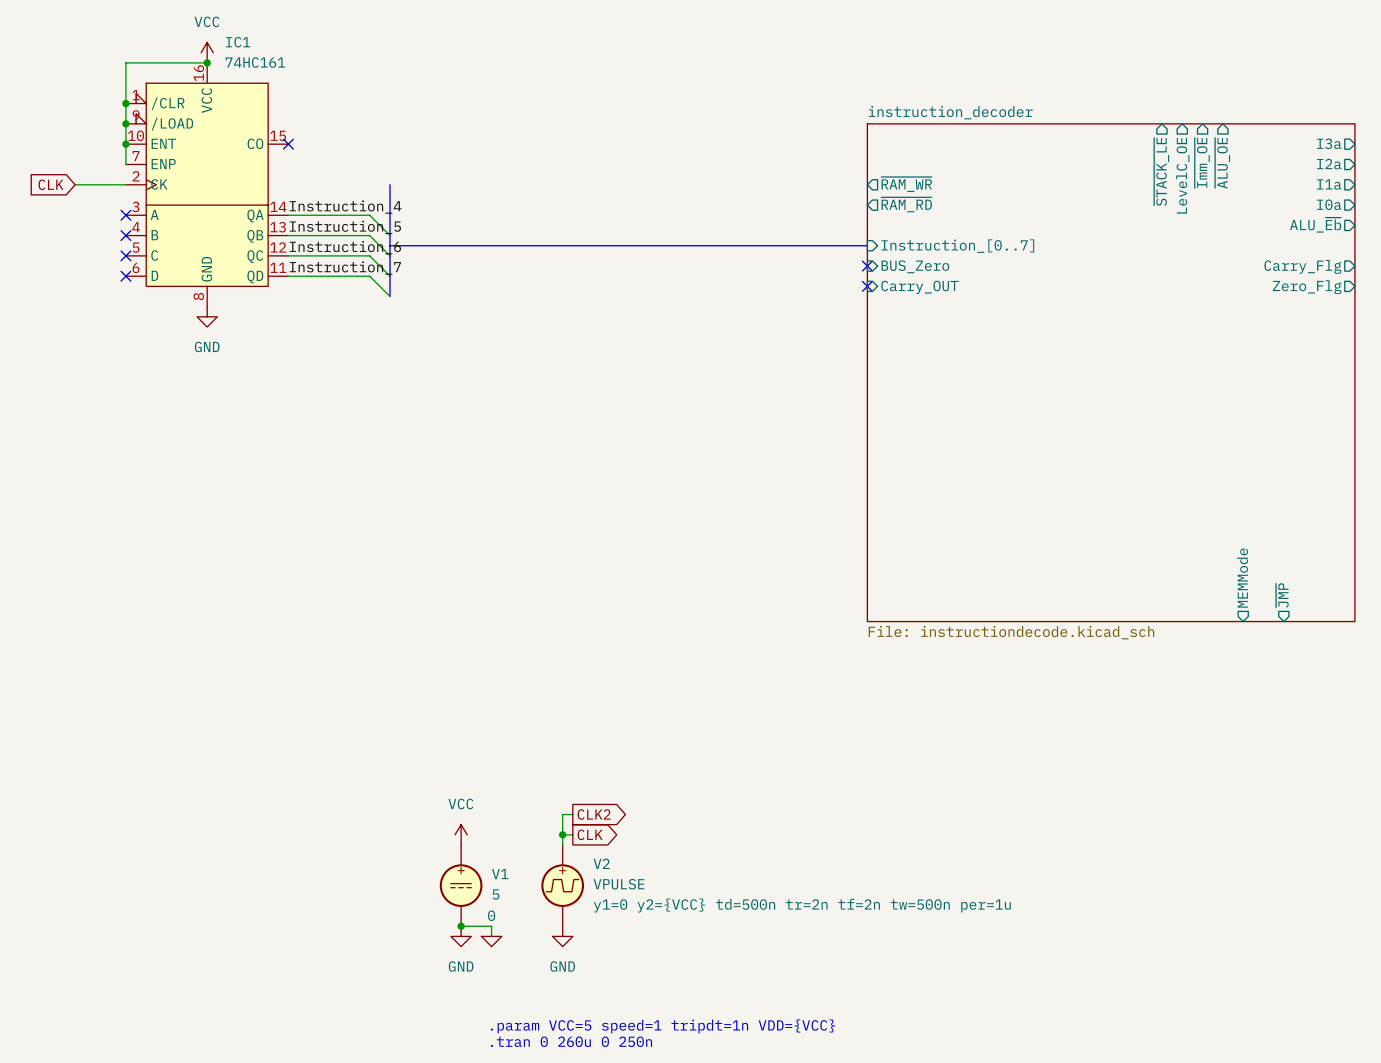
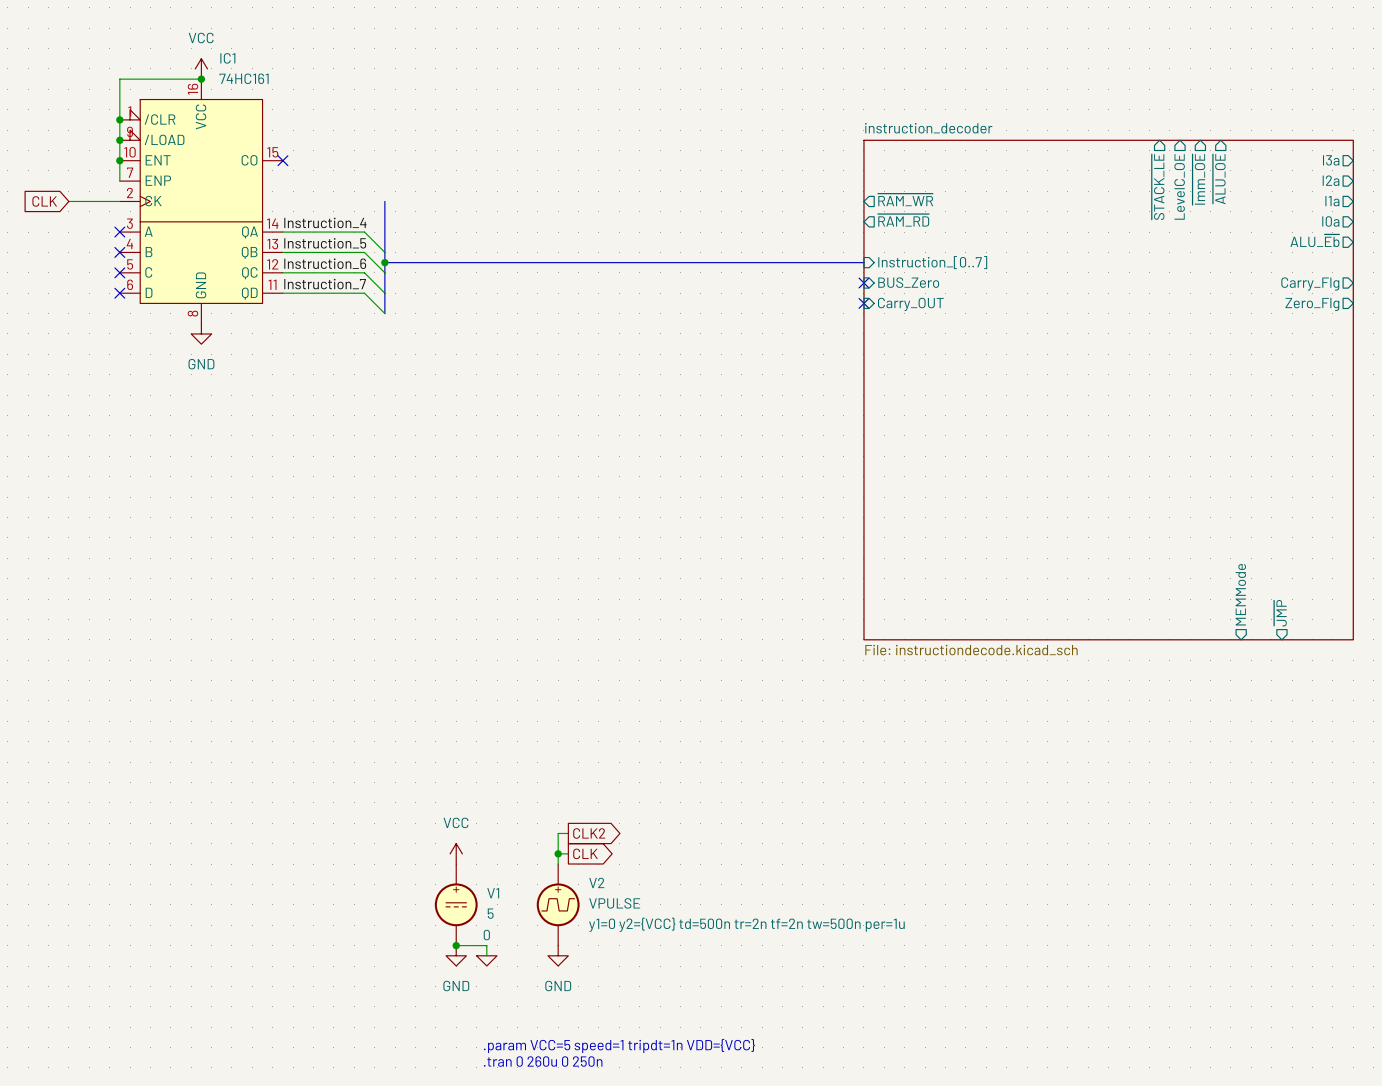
junction: none -> (384, 262)

